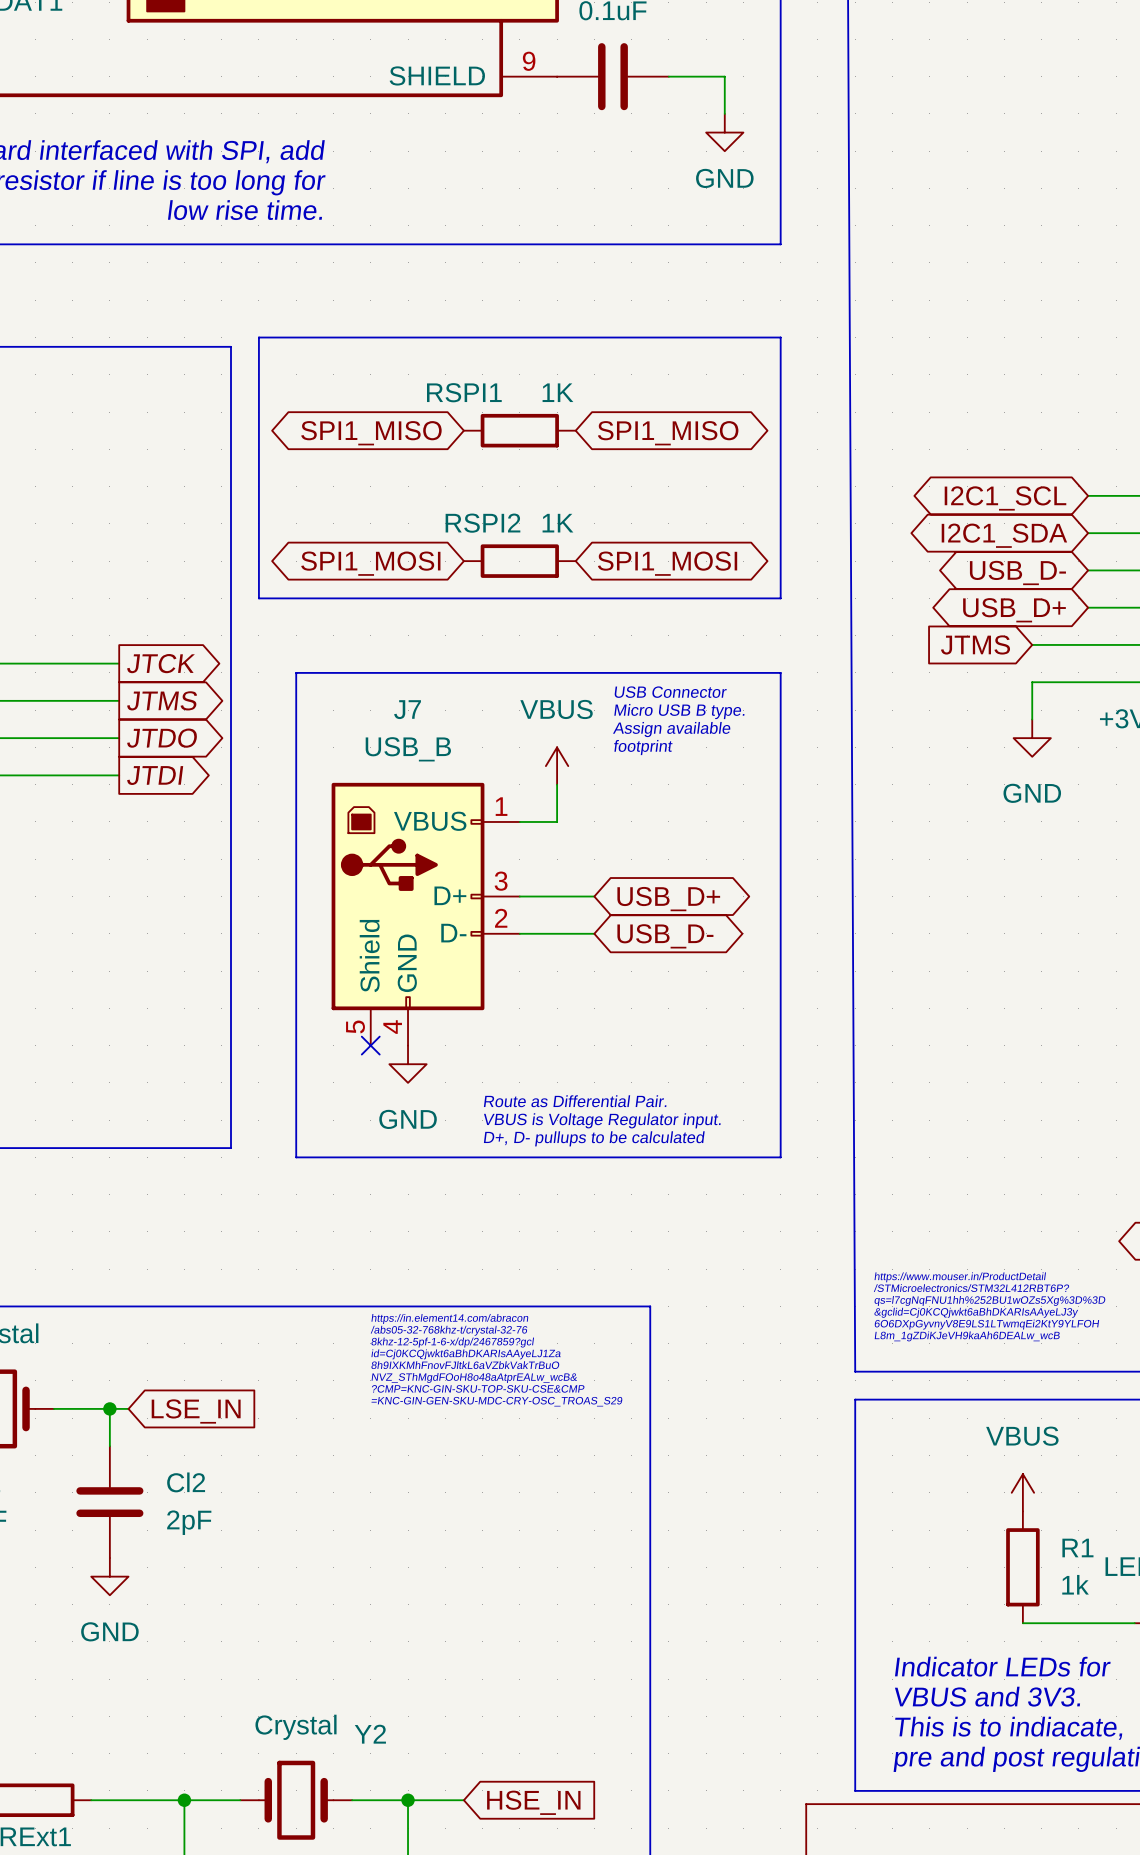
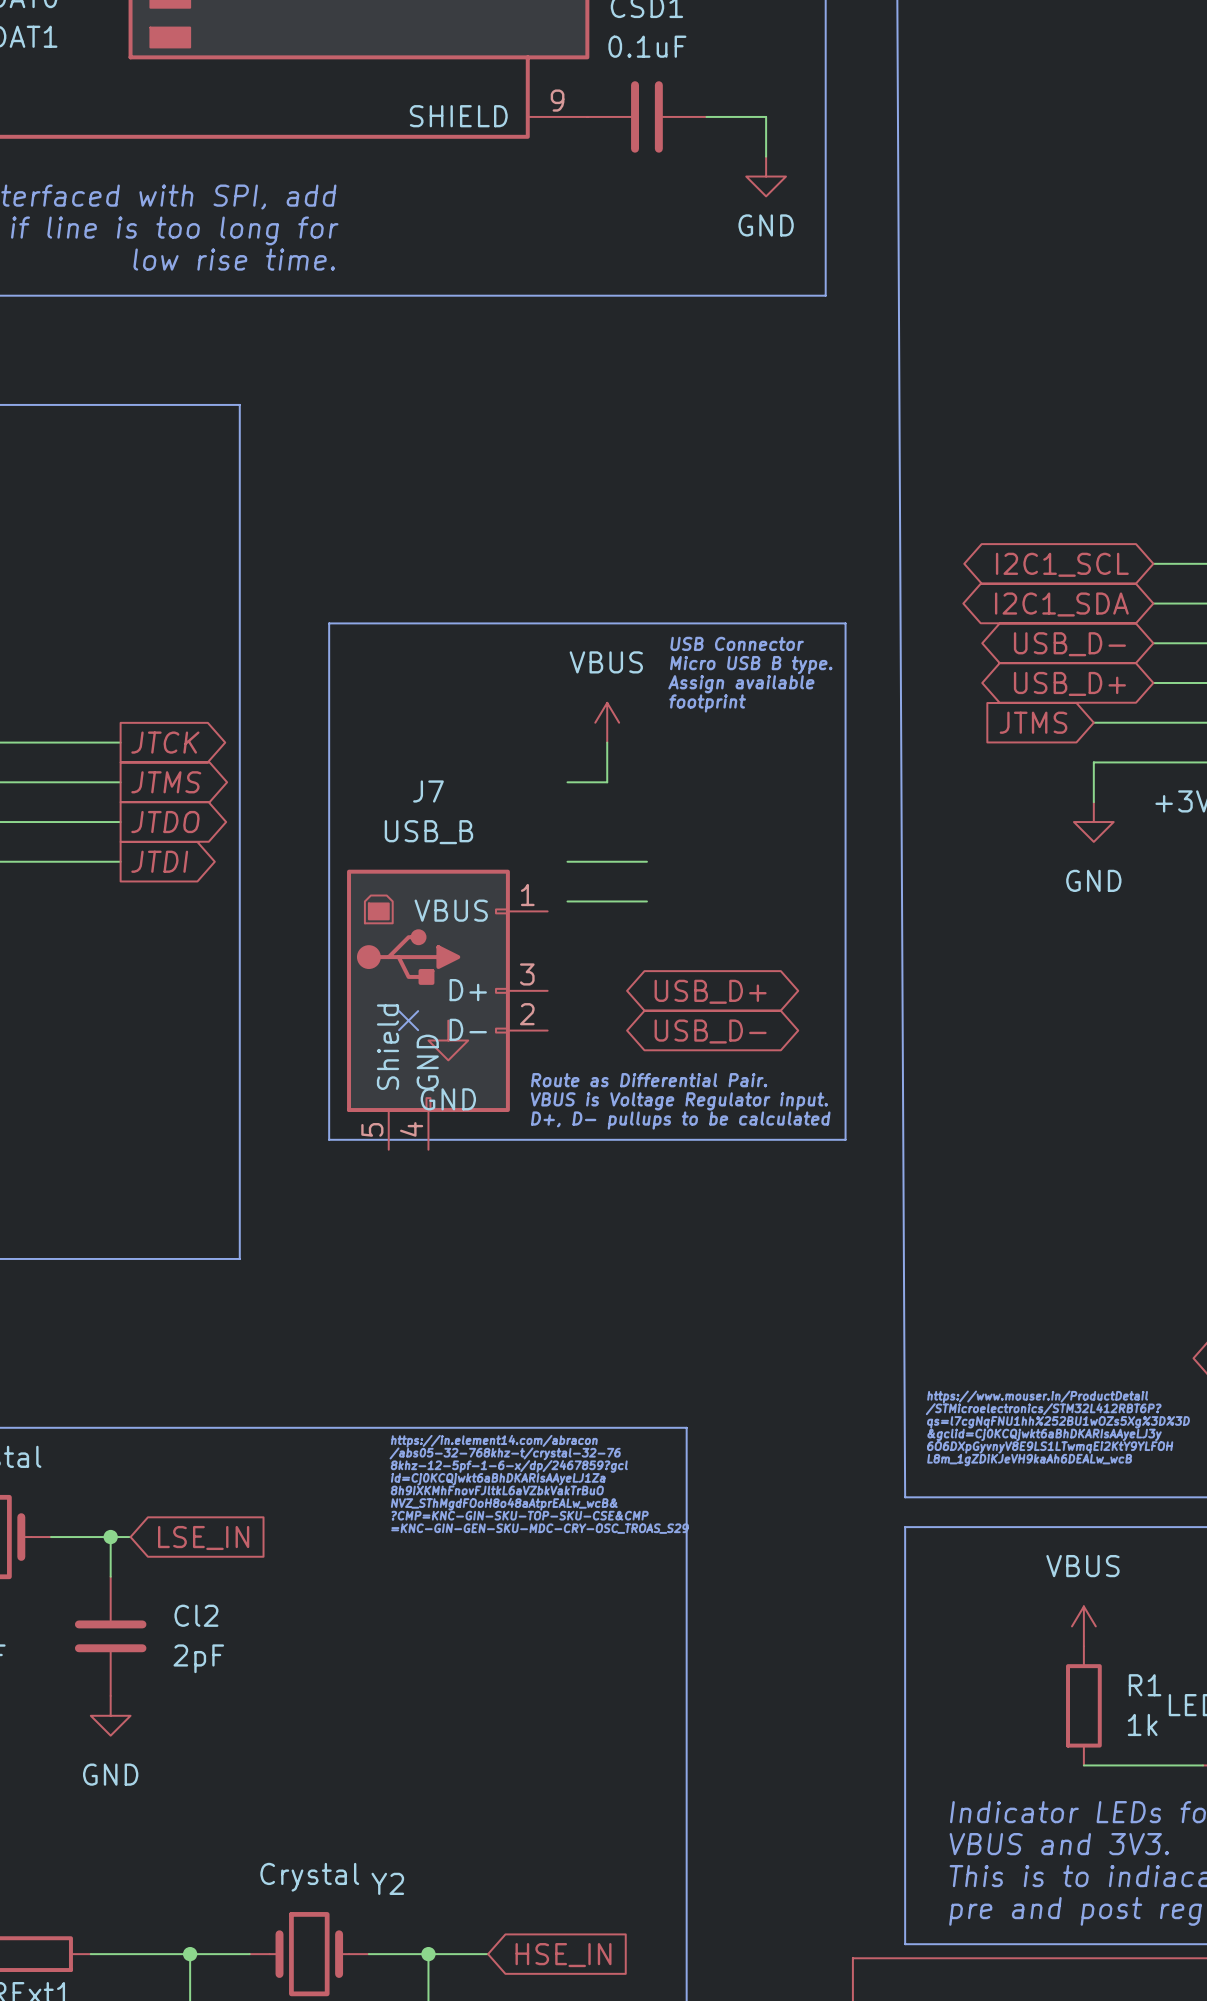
line: (258, 337) (780, 337) (780, 598) (258, 598) (258, 337) -> none
RSPI1: 1K (519, 430) -> none
global label: SPI1_MISO (371, 433) -> none
global label: SPI1_MISO (668, 433) -> none
RSPI2: 1K (519, 561) -> none
global label: SPI1_MOSI (370, 563) -> none
global label: SPI1_MOSI (667, 563) -> none
line: (296, 672) (780, 672) (780, 1157) (296, 1157) (296, 672) -> (329, 623) (845, 623) (845, 1139) (329, 1139) (329, 623)
text position: USB Connector (670, 692) -> USB Connector (737, 643)
text position: Micro USB B type. (679, 711) -> Micro USB B type. (751, 665)
text position: Assign available (671, 729) -> Assign available (741, 684)
text position: footprint (643, 747) -> footprint (707, 703)
power symbol position: VBUS (557, 766) -> VBUS (607, 722)
wire: (557, 784) (557, 821) (519, 821) -> (607, 742) (607, 782) (567, 782)
wire: (519, 896) (594, 896) -> (567, 861) (646, 861)
no-connect mark: none -> (408, 1020)
wire: (519, 933) (594, 933) -> (567, 901) (646, 901)
no-connect mark: (370, 1045) -> none
power symbol position: GND (408, 1064) -> GND (448, 1040)
text position: Route as Differential Pair. (575, 1101) -> Route as Differential Pair. (649, 1080)
text position: VBUS is Voltage Regulator input. (602, 1120) -> VBUS is Voltage Regulator input. (679, 1101)
text position: D+, D- pullups to be calculated (594, 1138) -> D+, D- pullups to be calculated (680, 1120)

